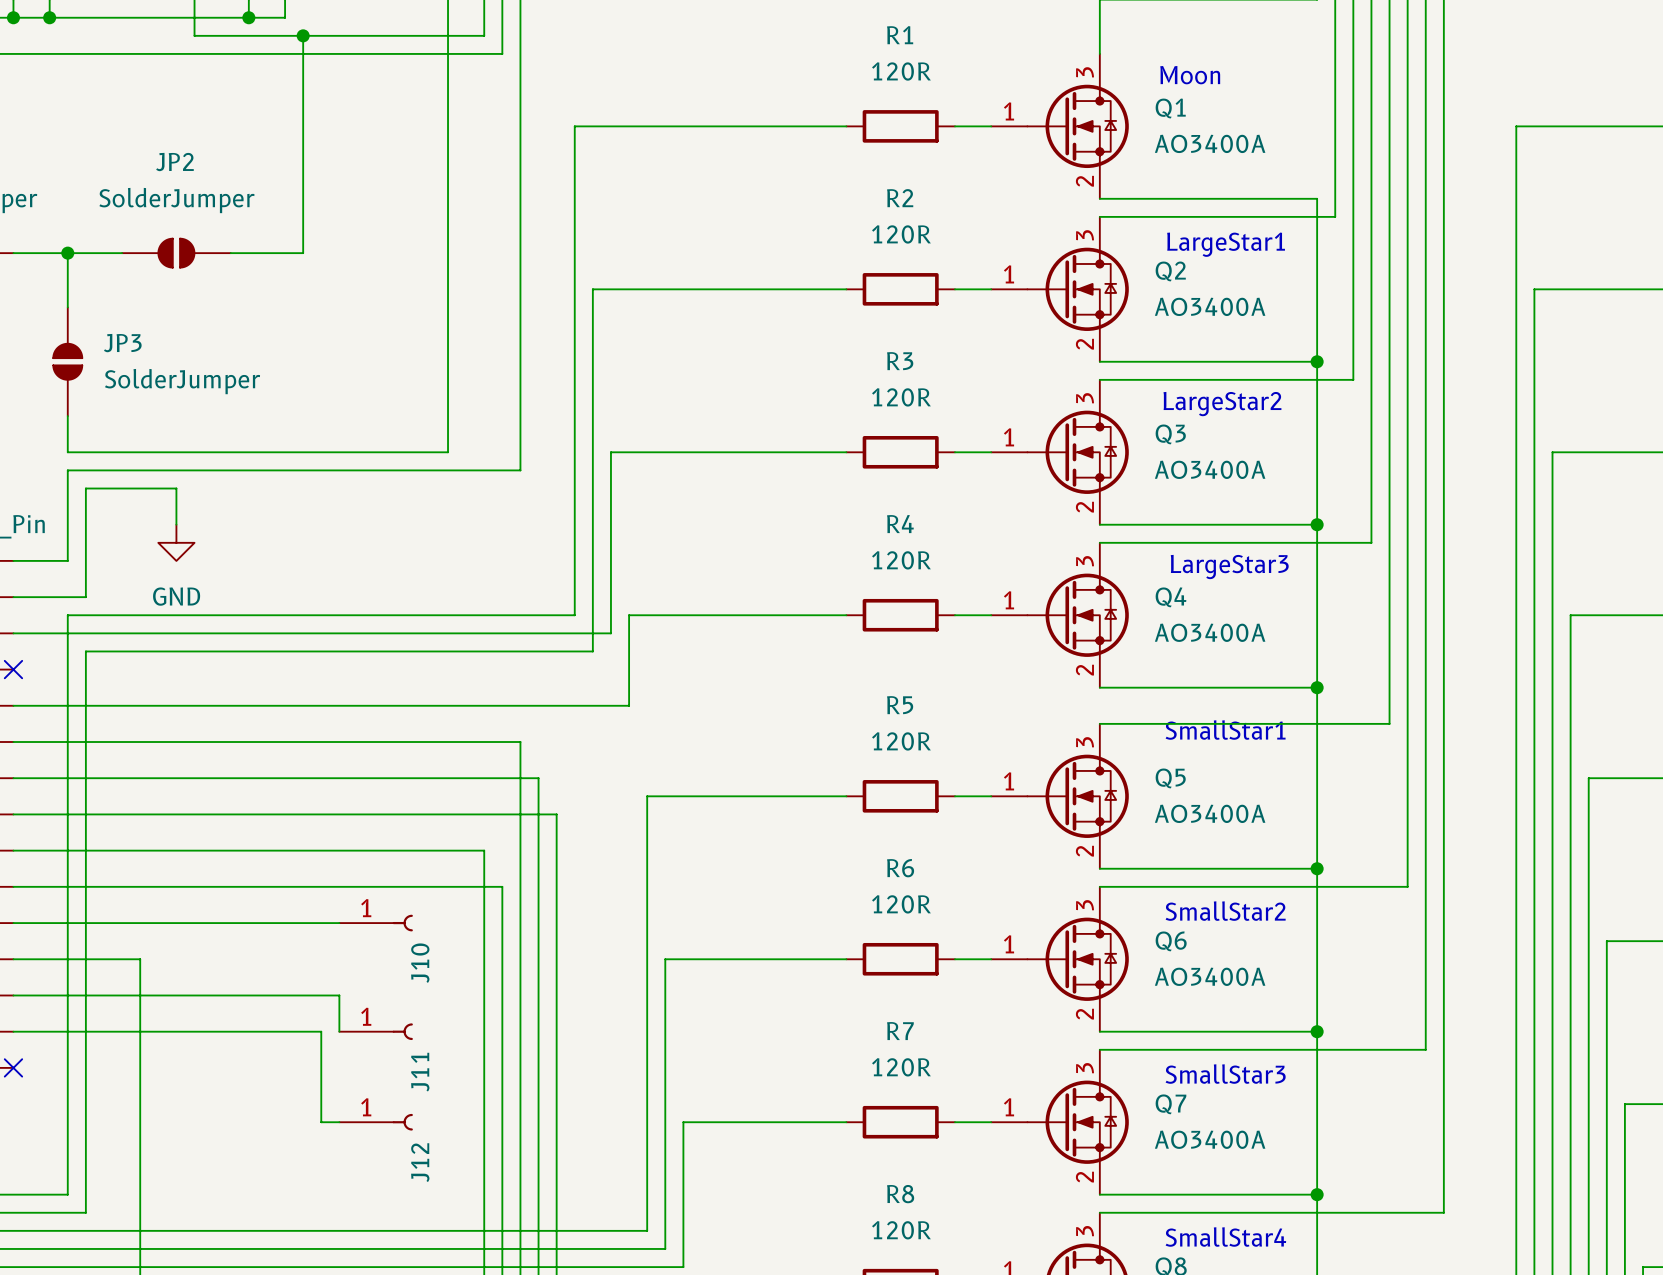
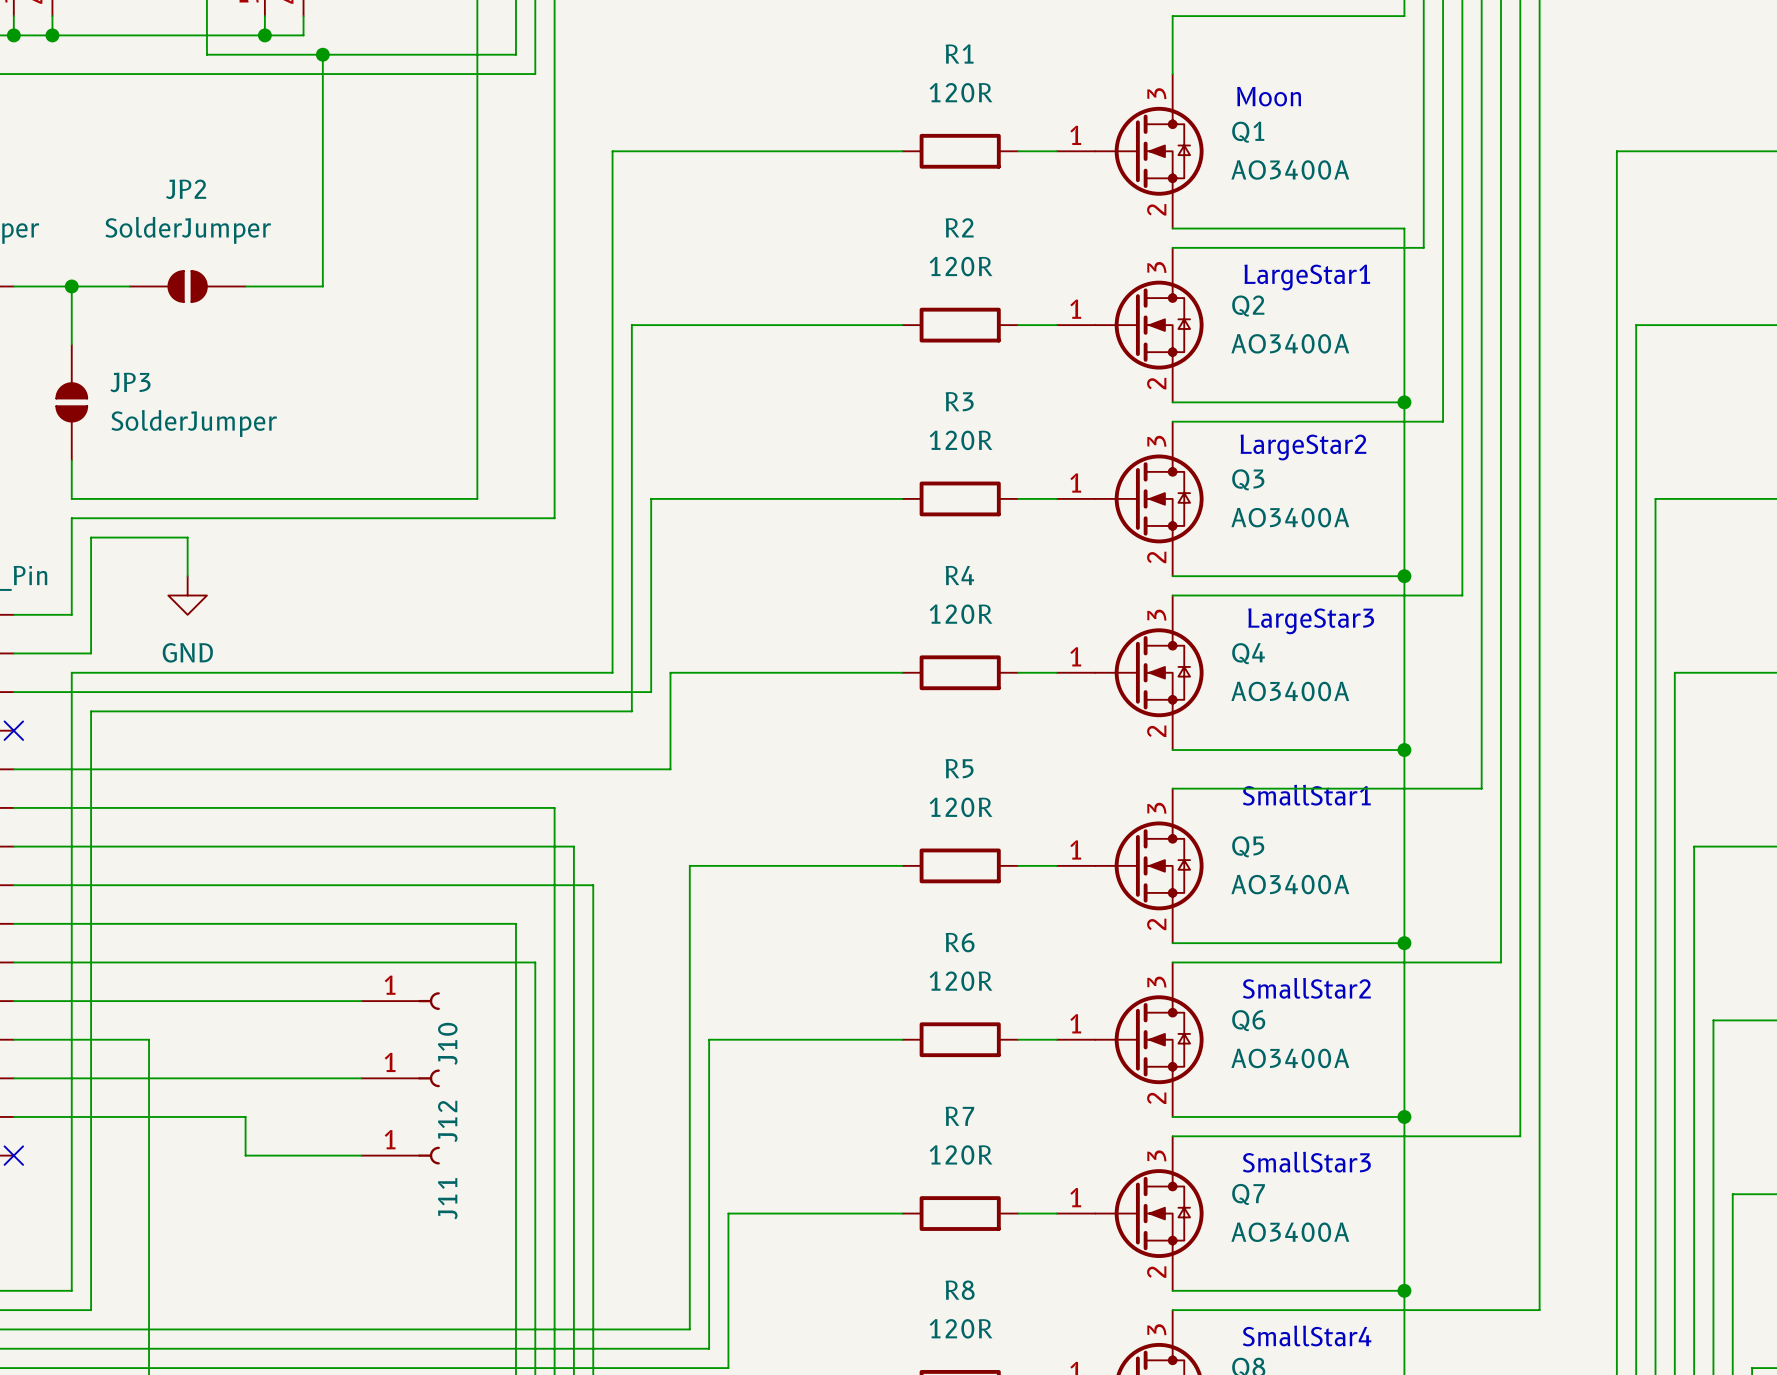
wire: (339, 995) (339, 1031) -> none
wire: (230, 1031) (321, 1031) (321, 1122) (339, 1122) -> (245, 1116) (245, 1155) (361, 1155)
J11 position: (376, 1031) -> (400, 1155)
J12 position: (376, 1122) -> (400, 1078)

